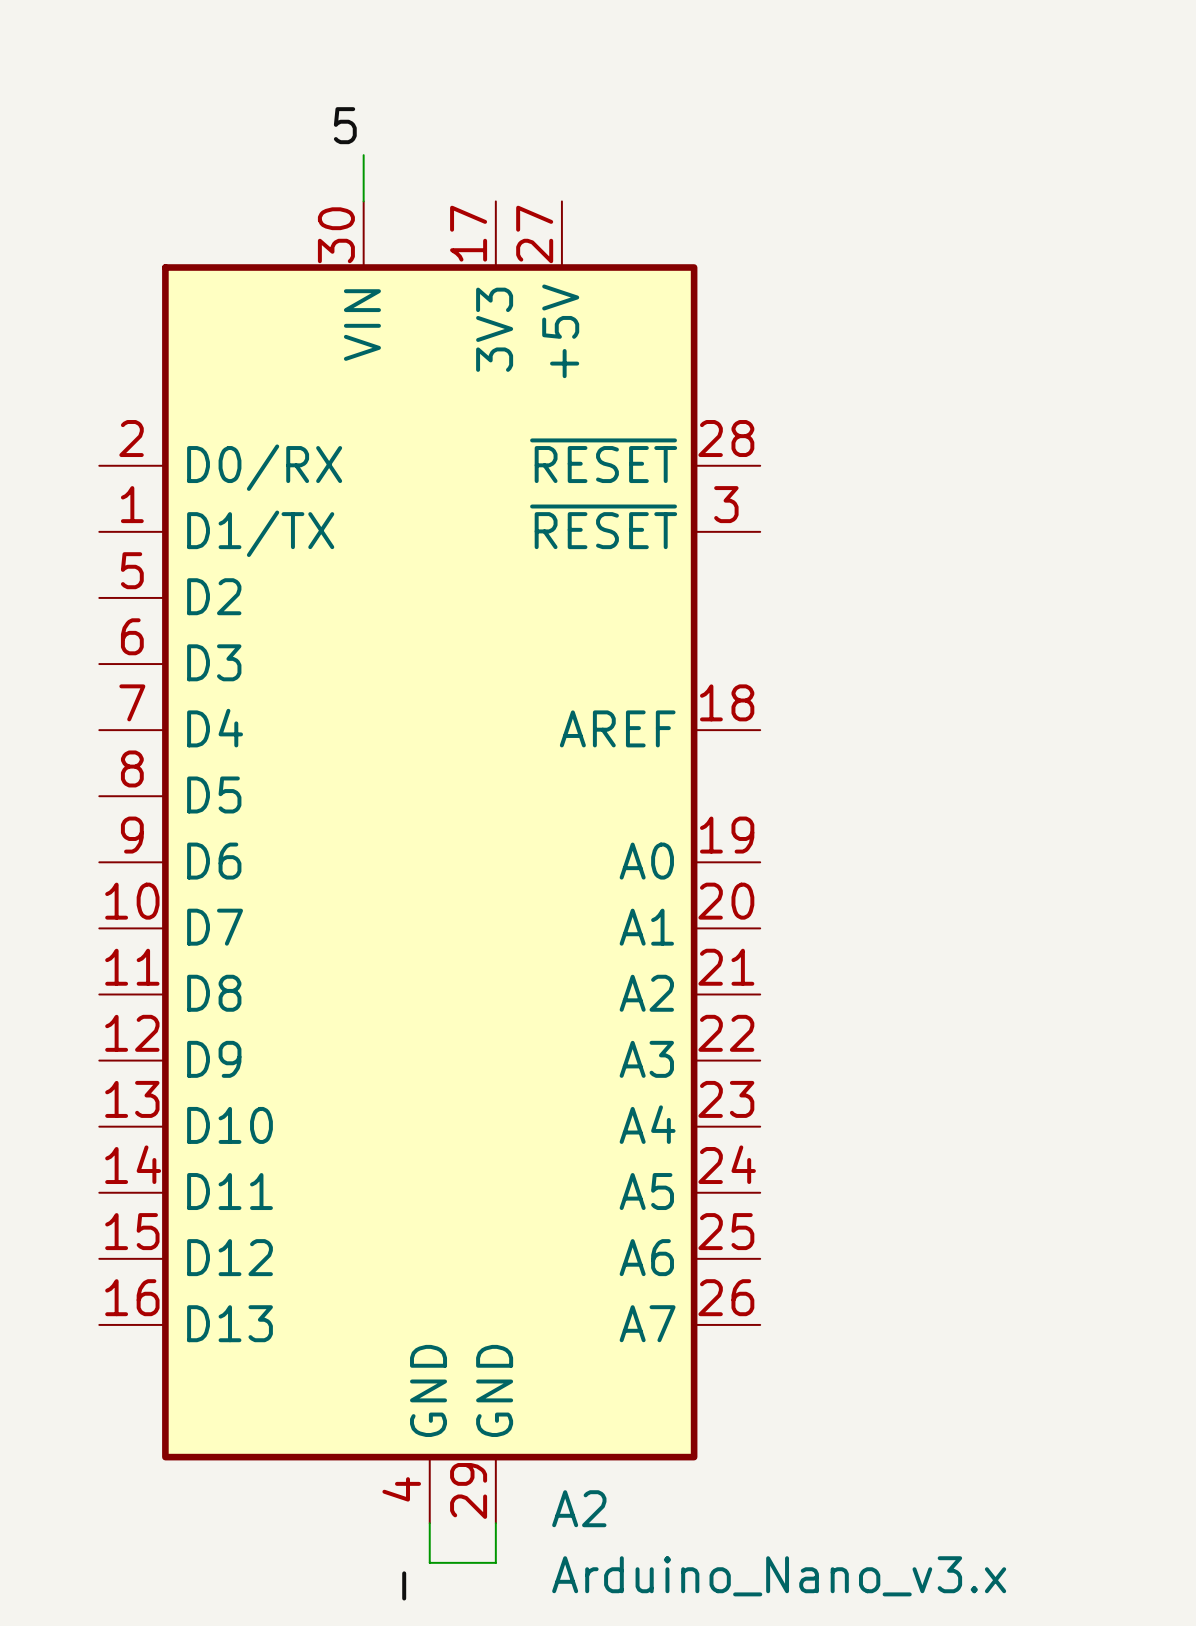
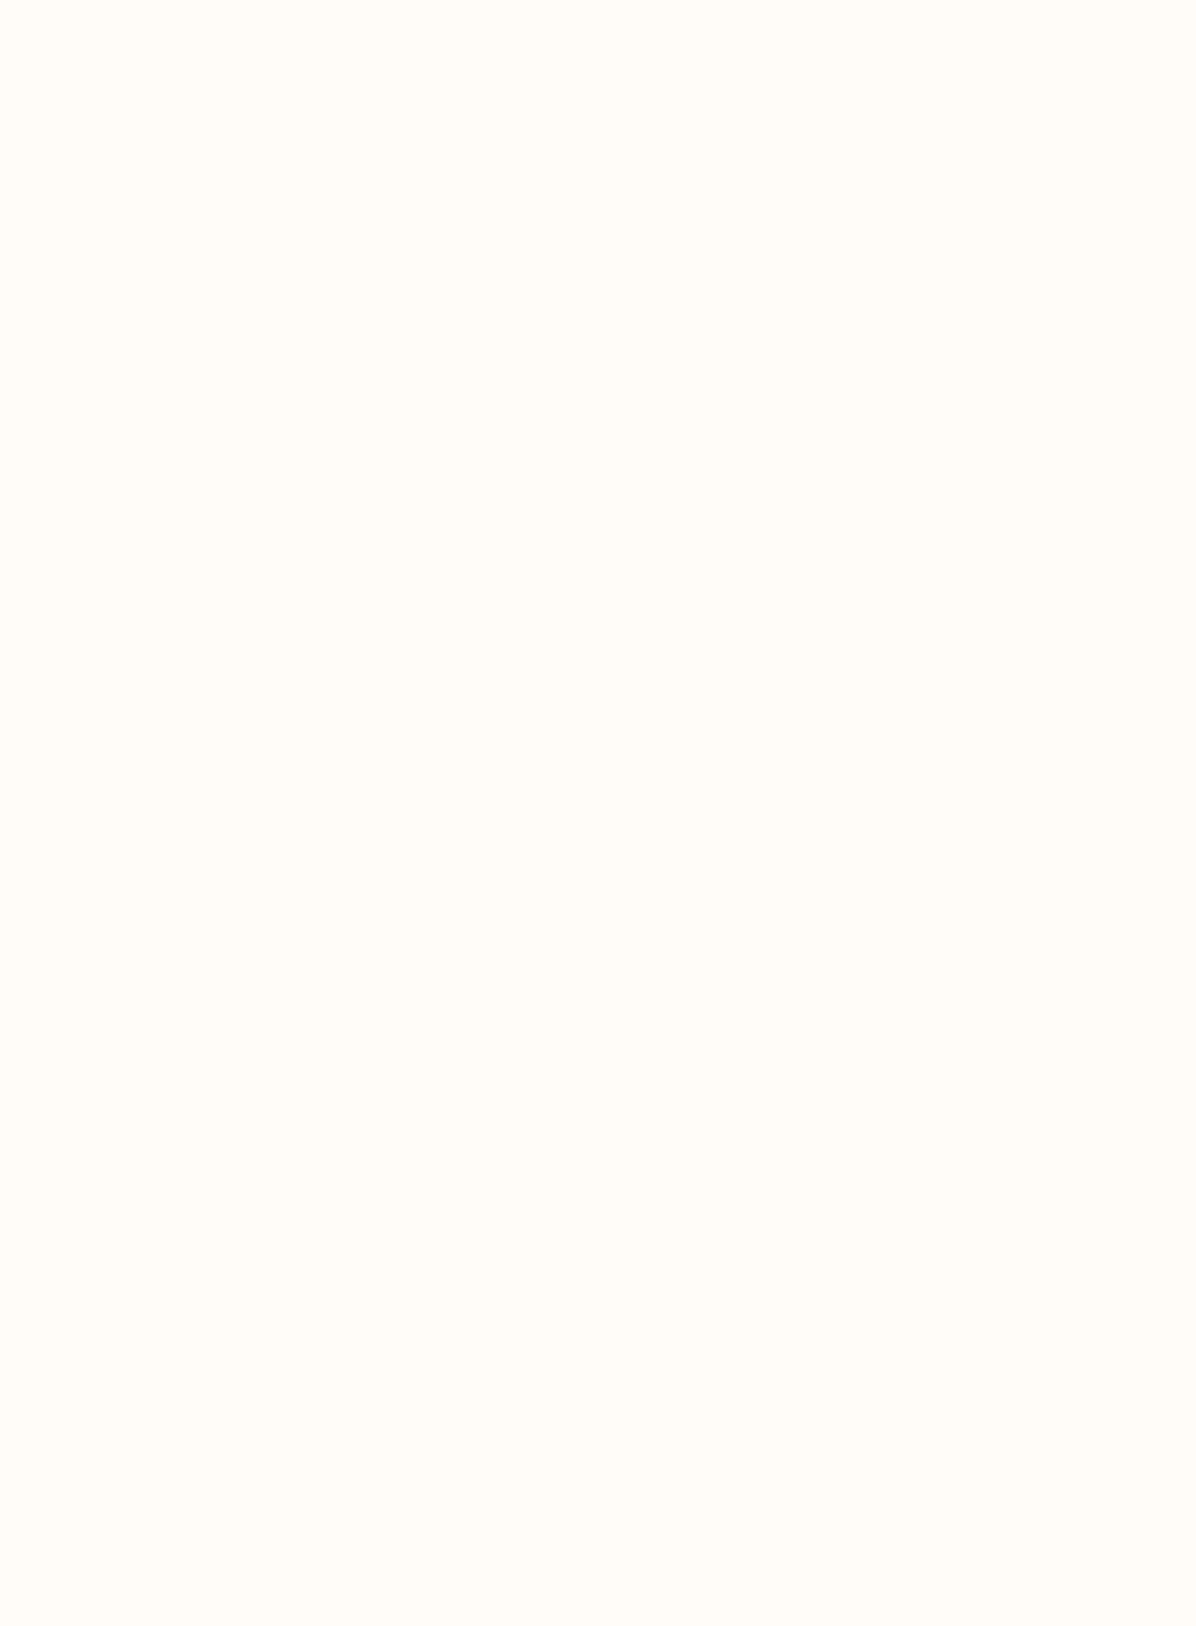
label: 5 (345, 125) -> none
wire: (363, 155) (363, 201) -> none
A2: Arduino_Nano_v3.x (429, 862) -> none
wire: (429, 1523) (429, 1562) (495, 1562) (495, 1523) -> none
label: - (404, 1585) -> none

